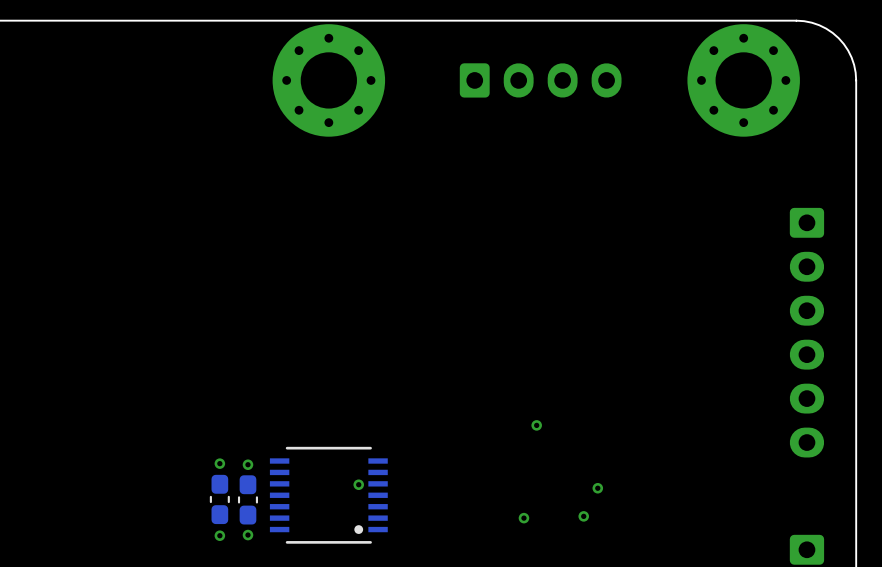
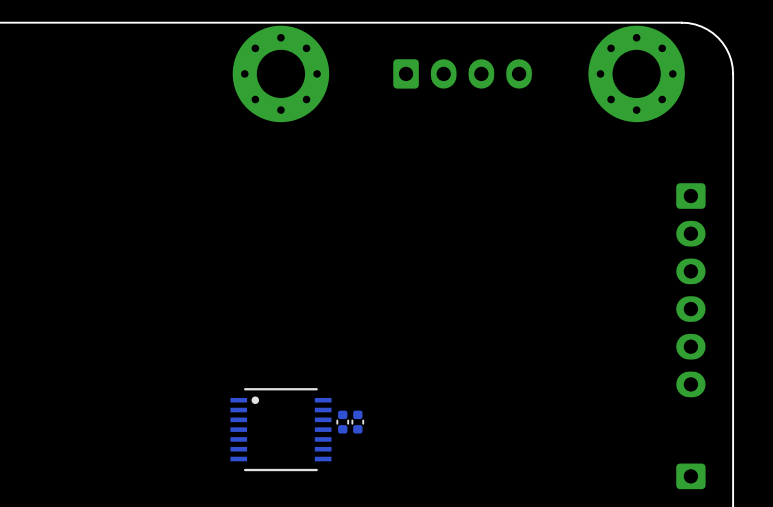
via: (536, 425) -> none
via: (219, 463) -> none
via: (247, 464) -> none
via: (358, 484) -> none
part: none -> (342, 422)
part: none -> (357, 422)
via: (597, 488) -> none
part rotation: 0° (328, 495) -> 180° (280, 429)
part: (219, 499) -> none
part: (247, 499) -> none
via: (583, 516) -> none
via: (523, 518) -> none
via: (219, 535) -> none
via: (247, 535) -> none

